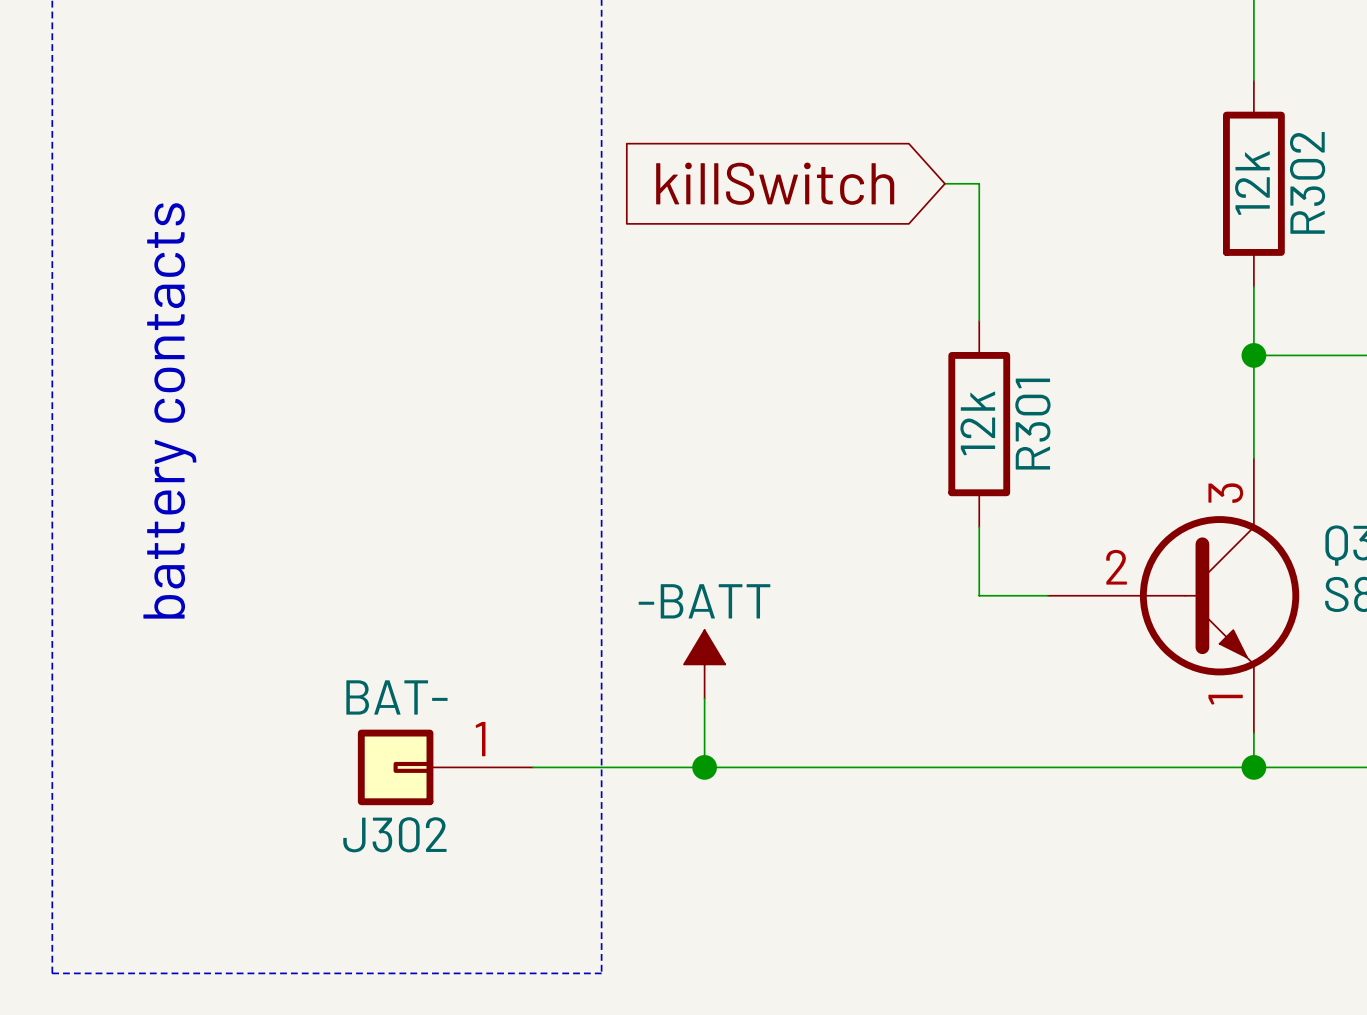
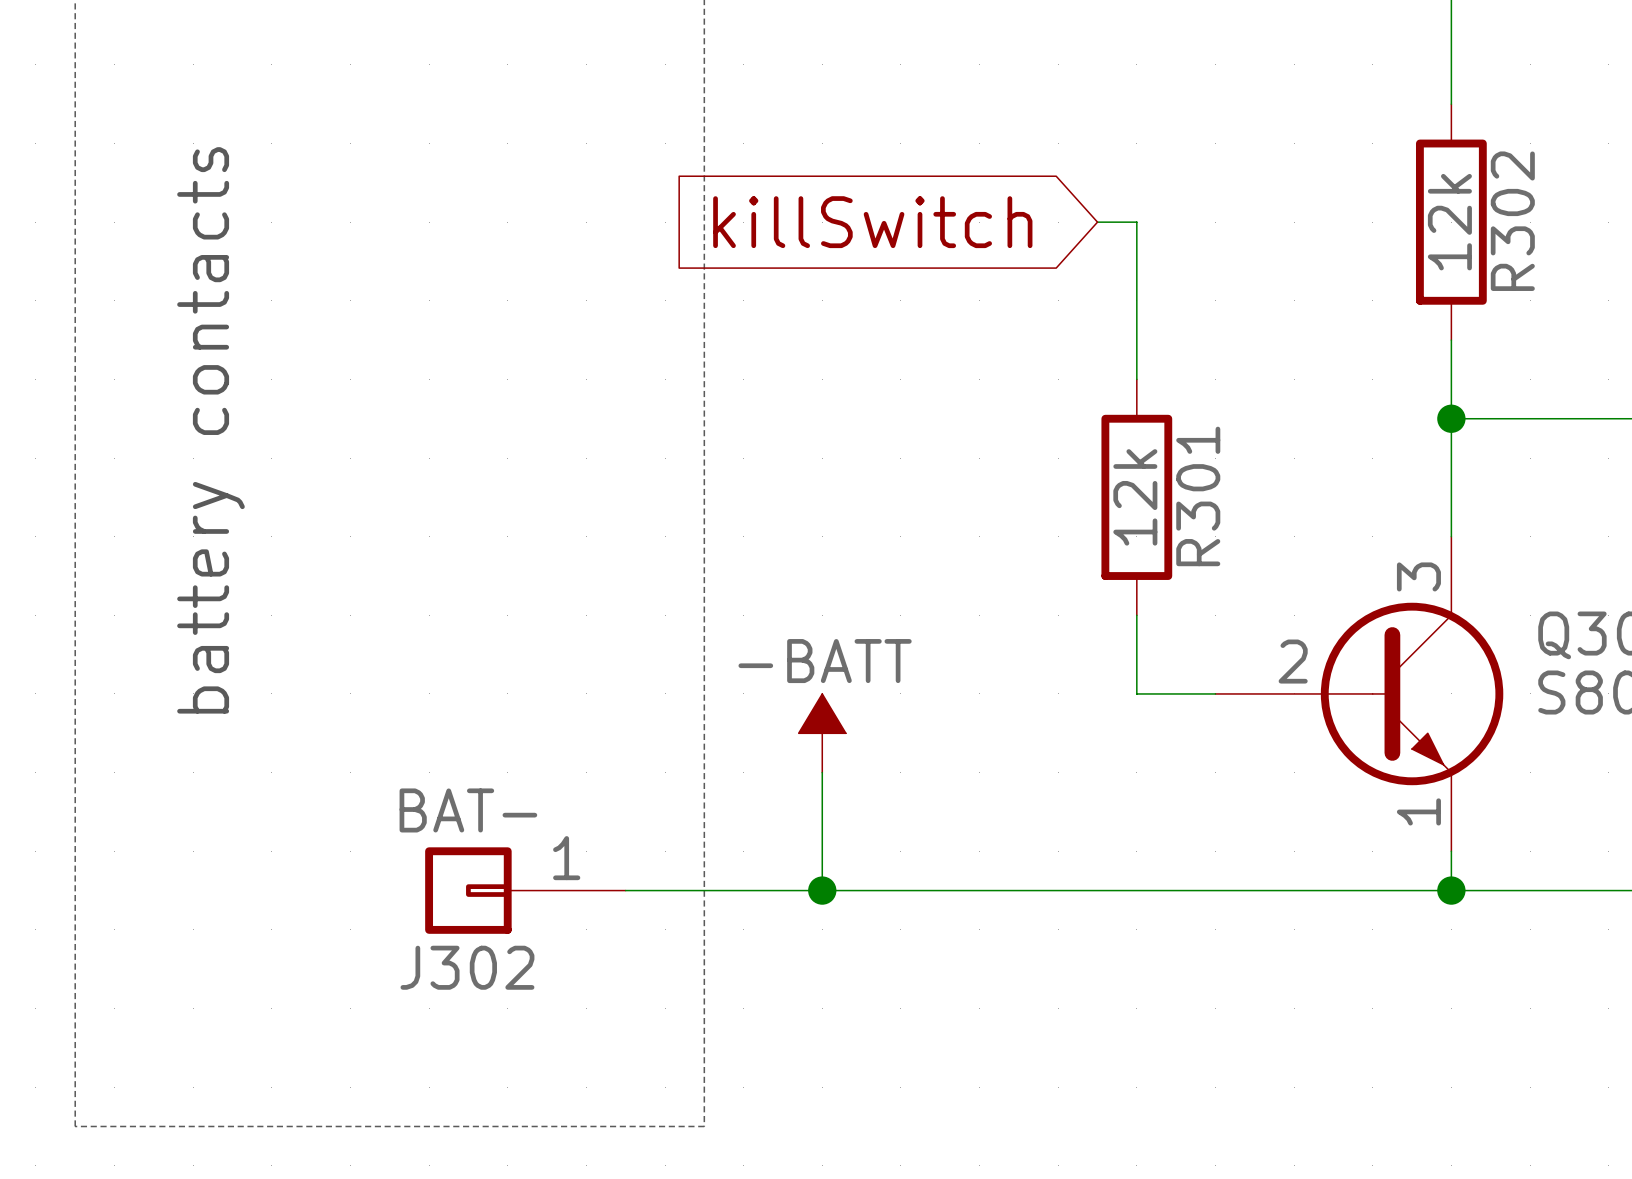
power symbol position: -BATT (704, 664) -> -BATT (822, 733)

